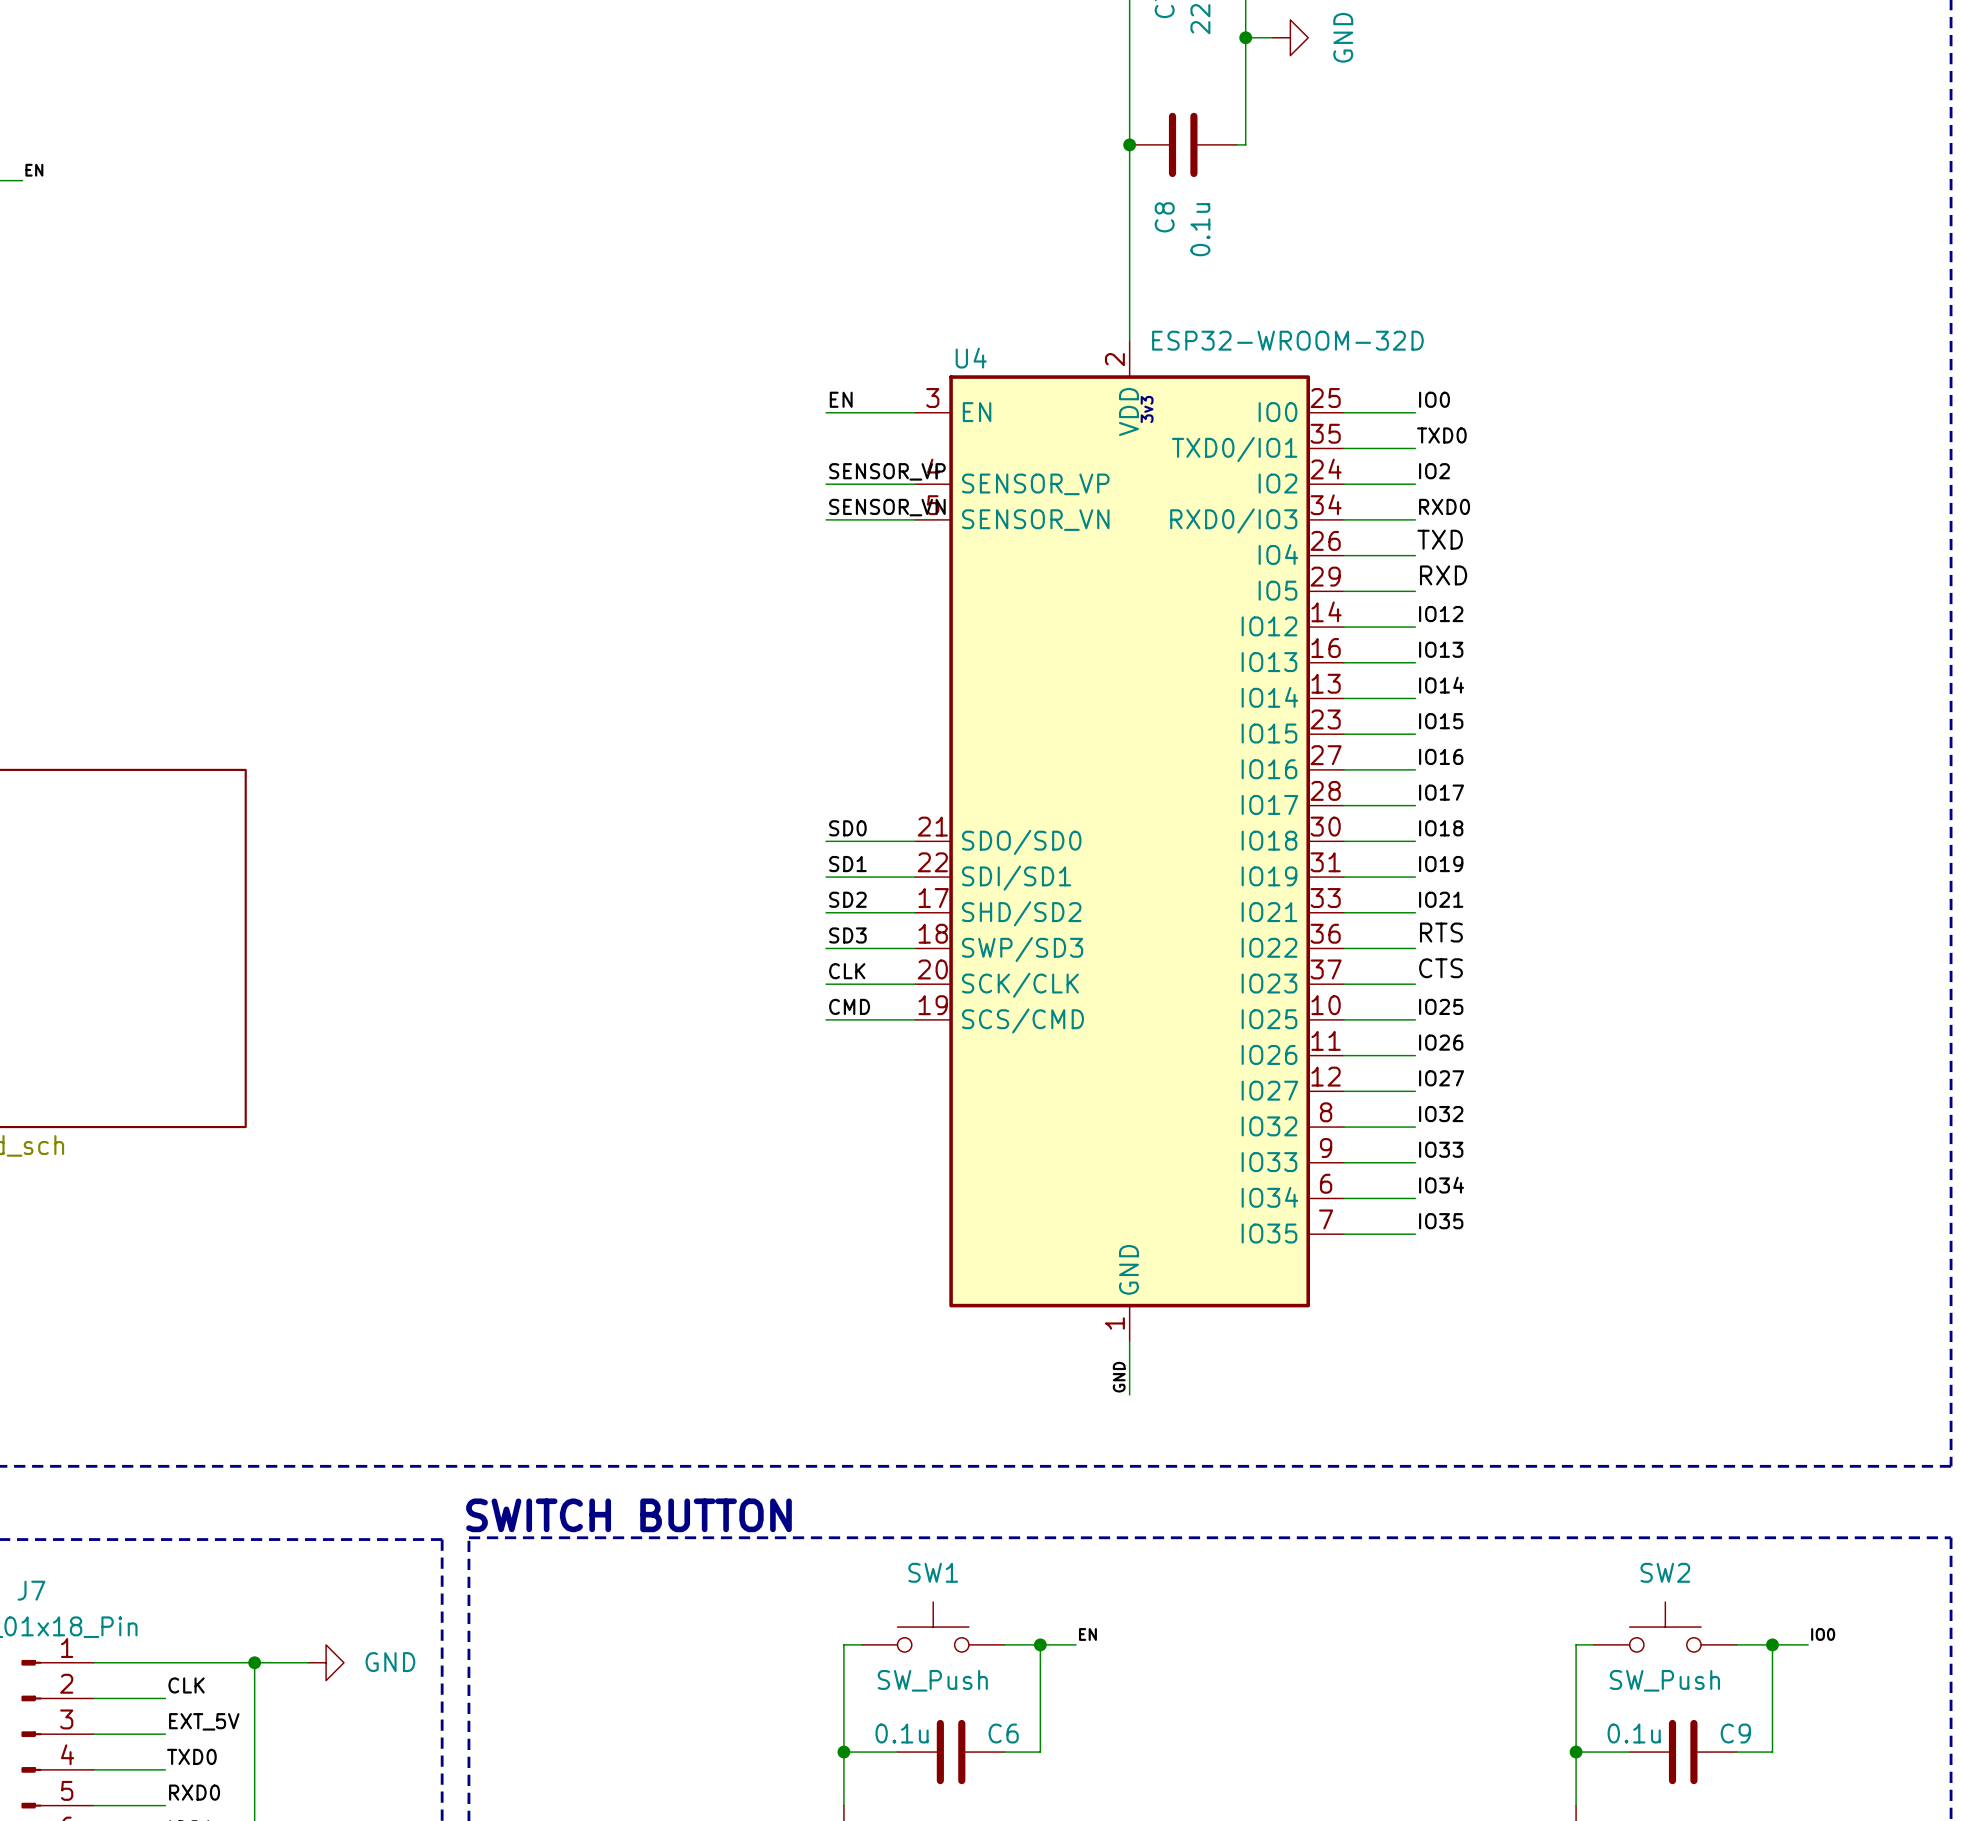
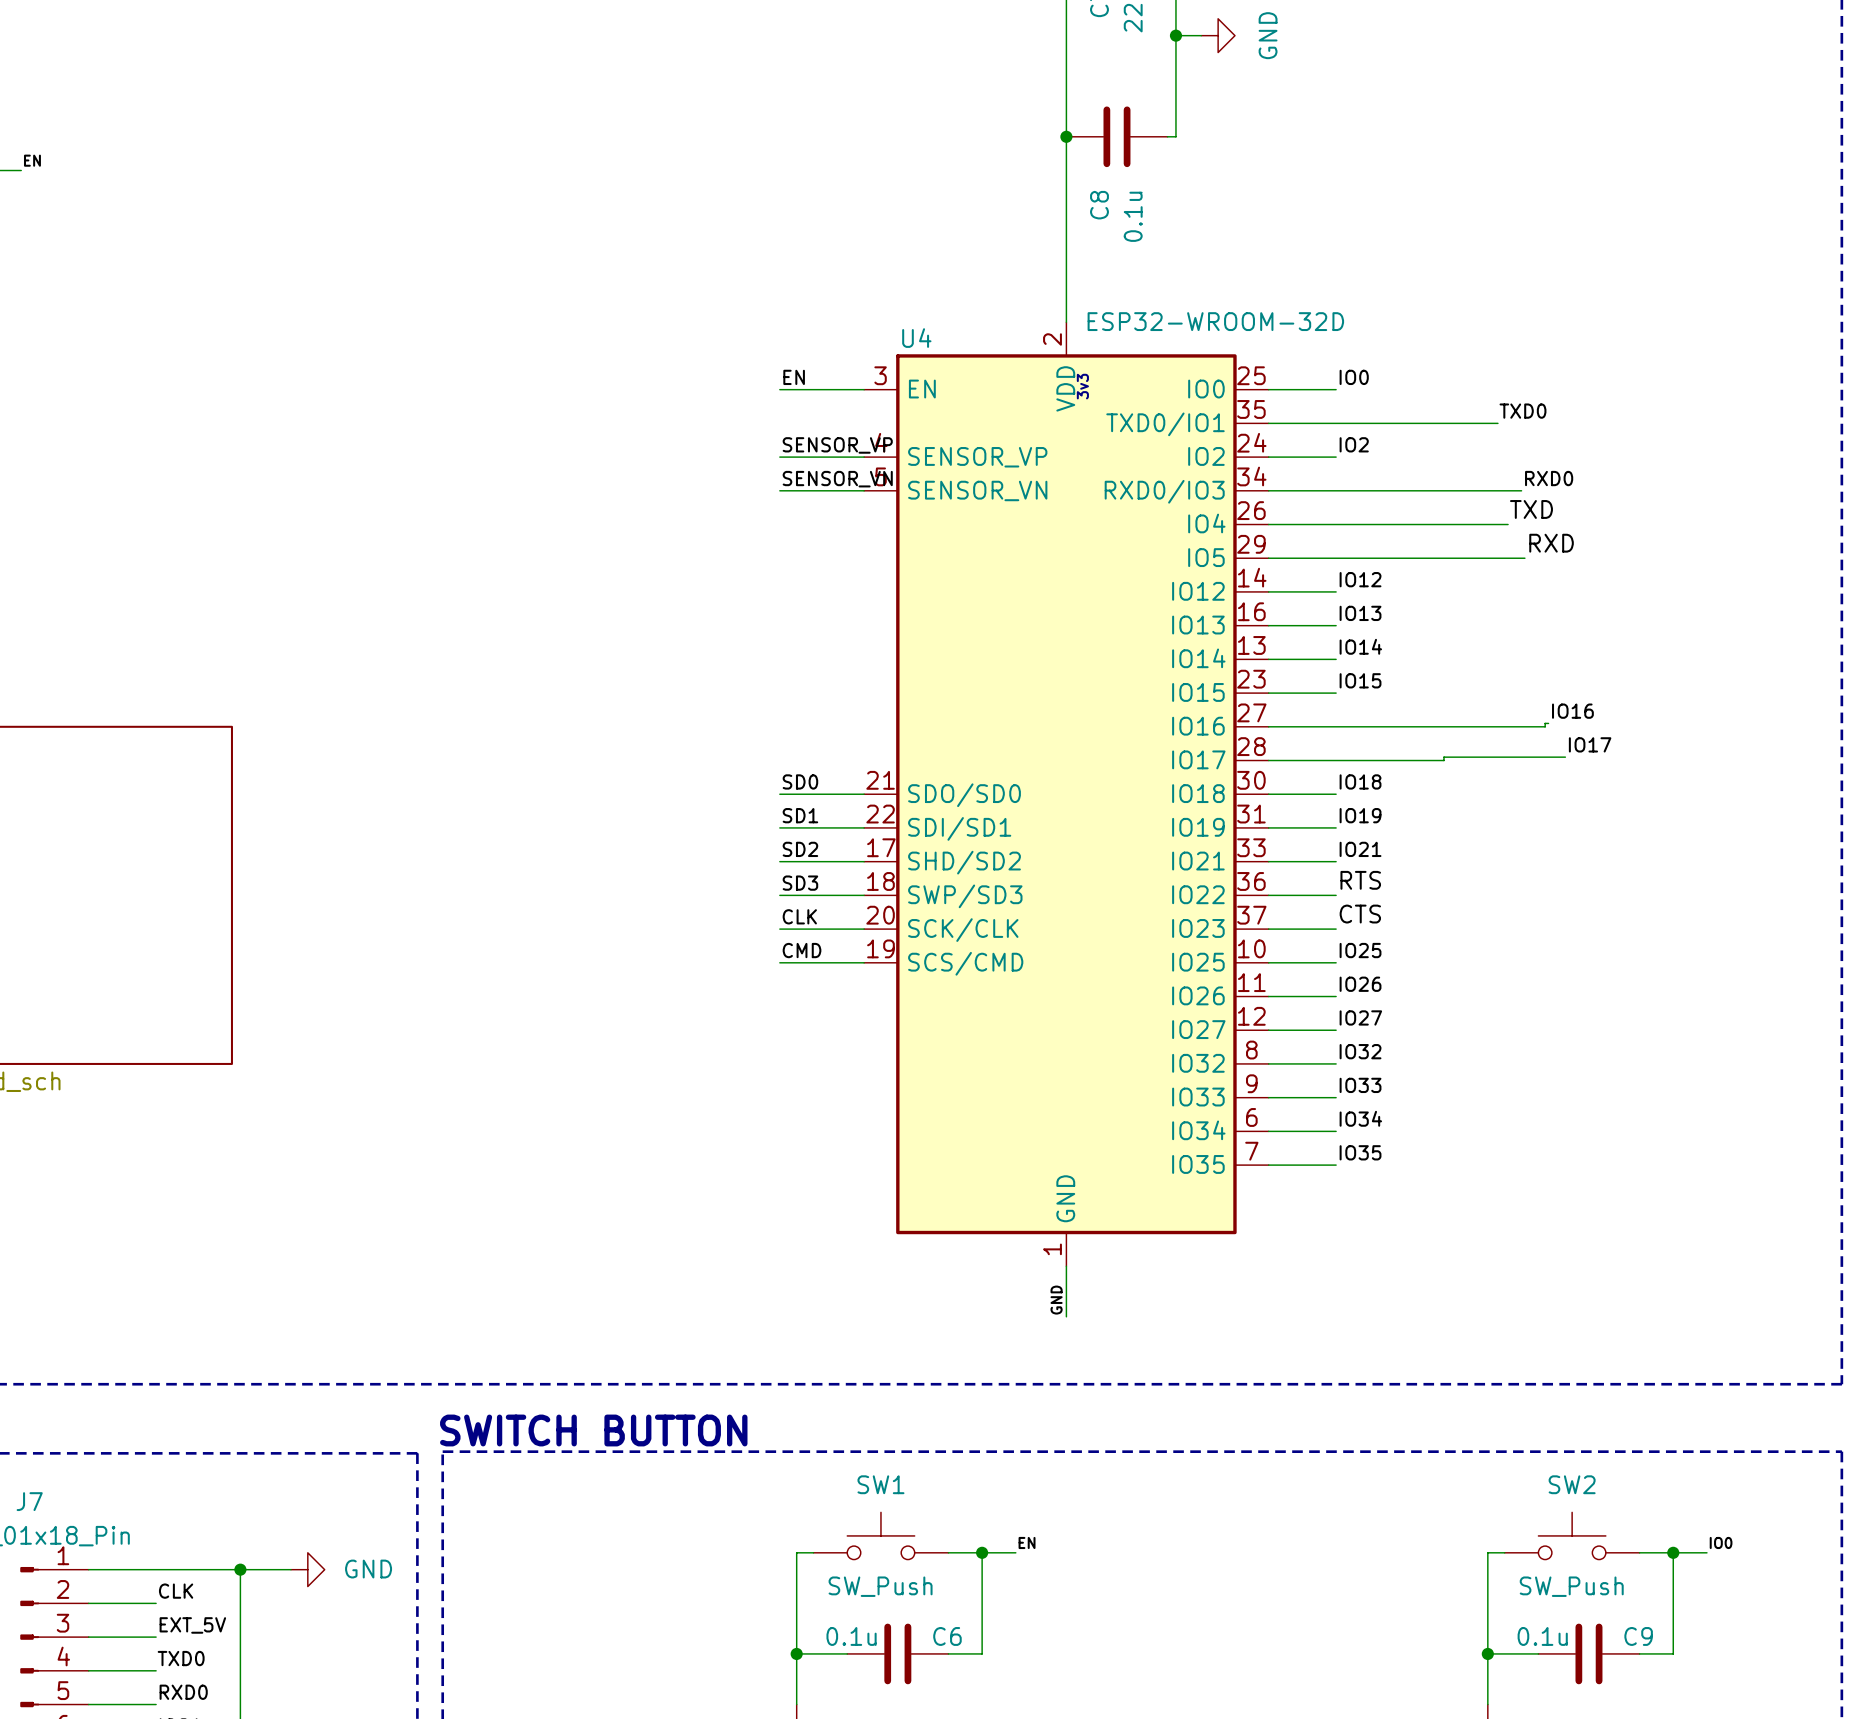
label position: TXD0 (1441, 435) -> TXD0 (1522, 411)
wire: none -> (1336, 423) (1497, 423)
label position: RXD0 (1444, 506) -> RXD0 (1549, 478)
wire: none -> (1336, 490) (1521, 490)
label position: TXD (1440, 539) -> TXD (1531, 509)
wire: none -> (1336, 524) (1508, 524)
label position: RXD (1443, 575) -> RXD (1551, 543)
wire: none -> (1336, 558) (1524, 558)
label position: IO16 (1441, 756) -> IO16 (1572, 711)
wire: none -> (1548, 723) (1545, 723) (1545, 726) (1336, 726)
label position: IO17 (1441, 792) -> IO17 (1590, 744)
wire: none -> (1565, 757) (1444, 757) (1444, 760) (1336, 760)

